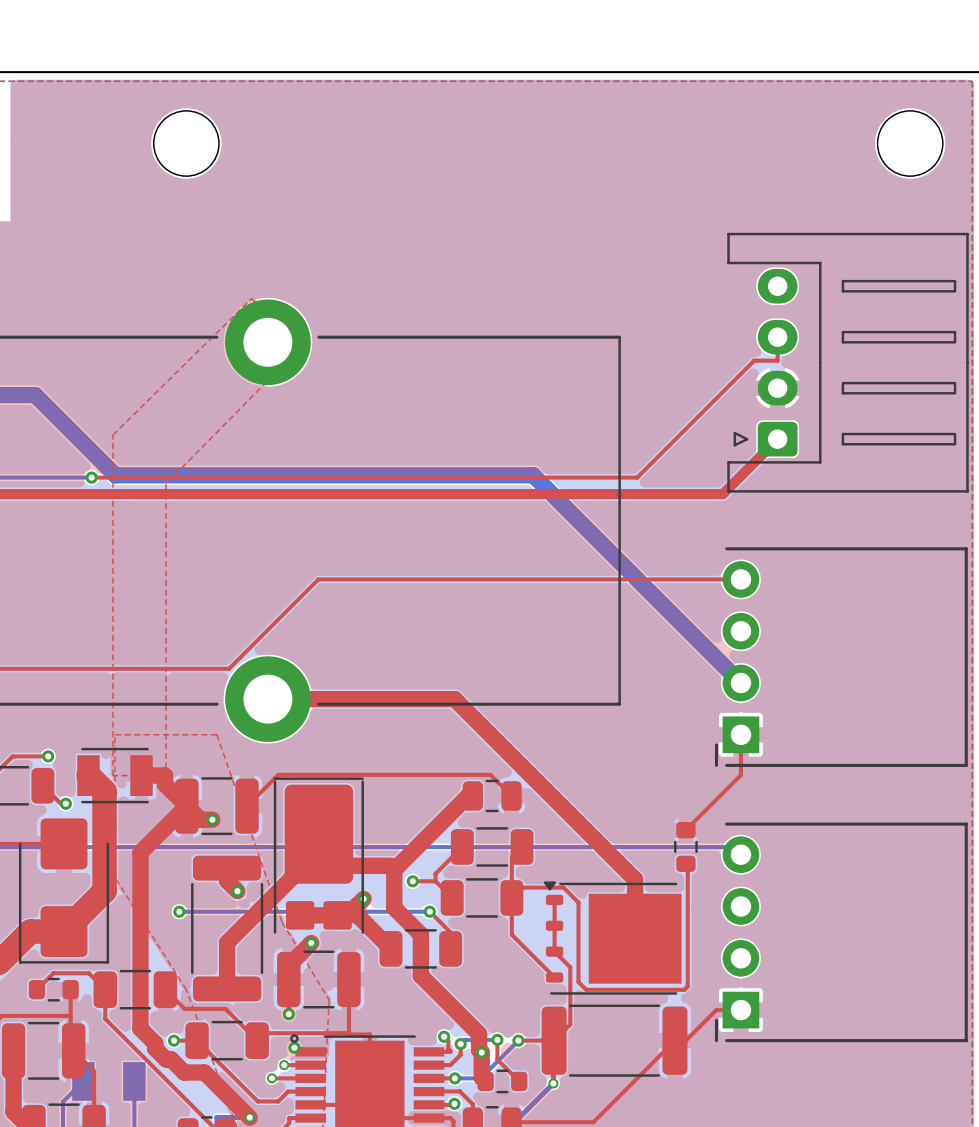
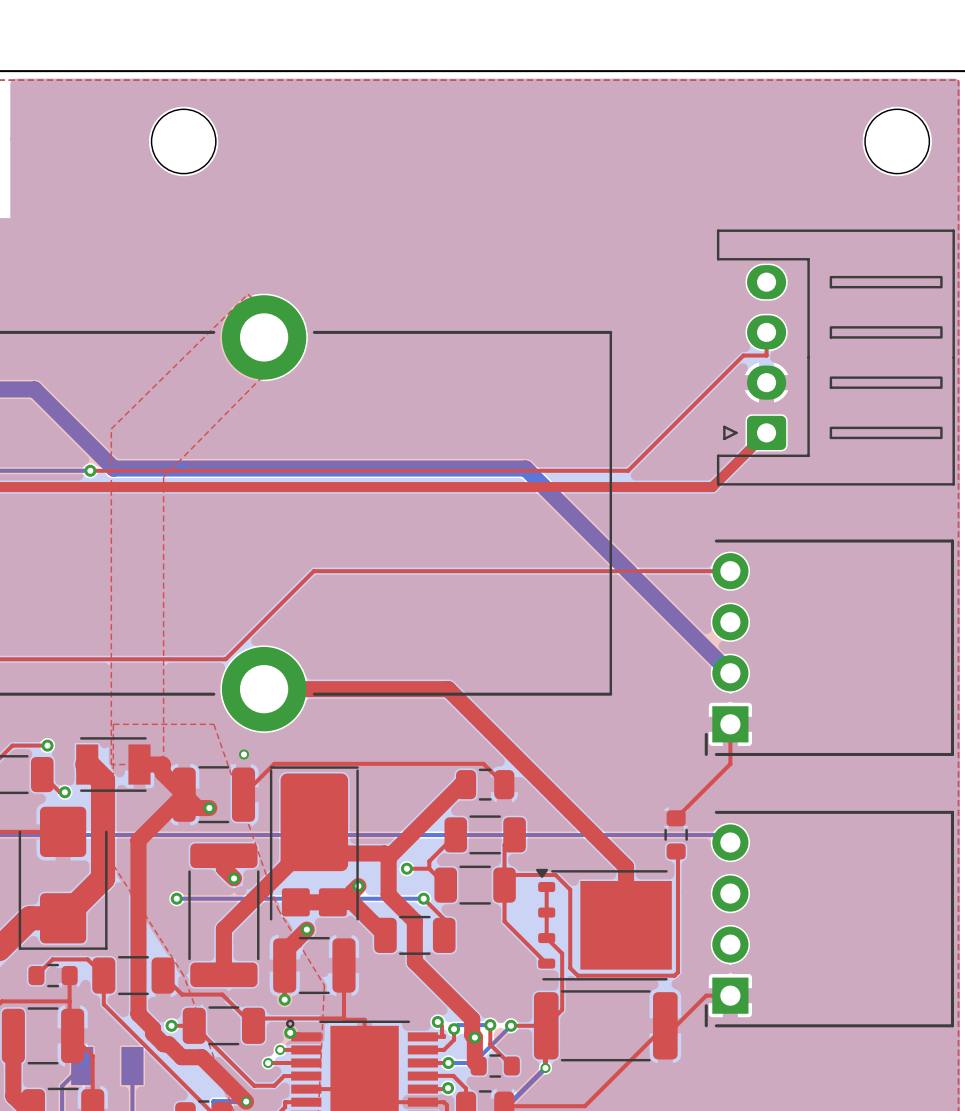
via: none -> (244, 754)

